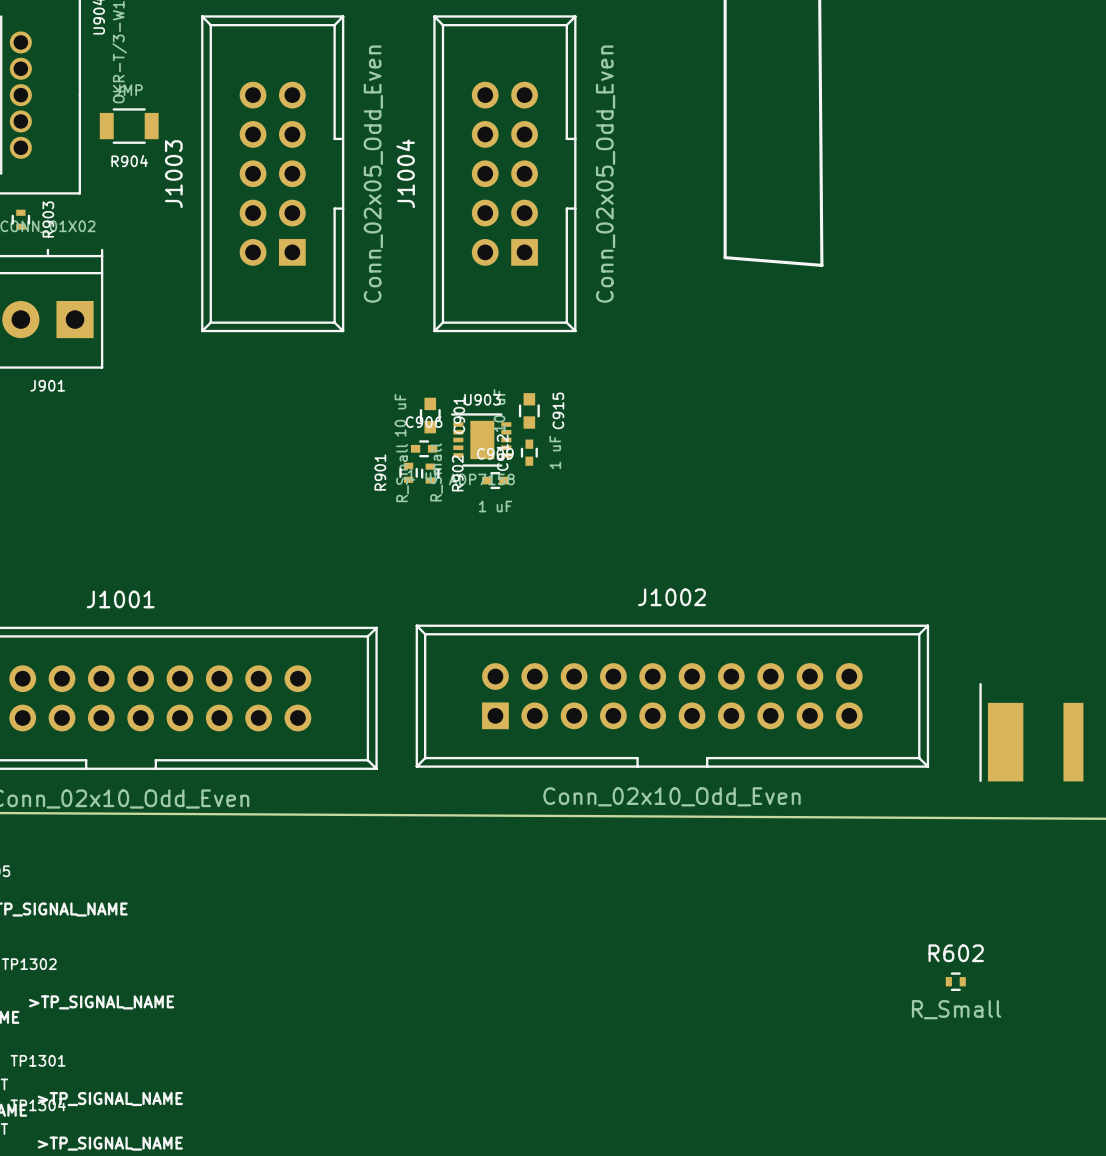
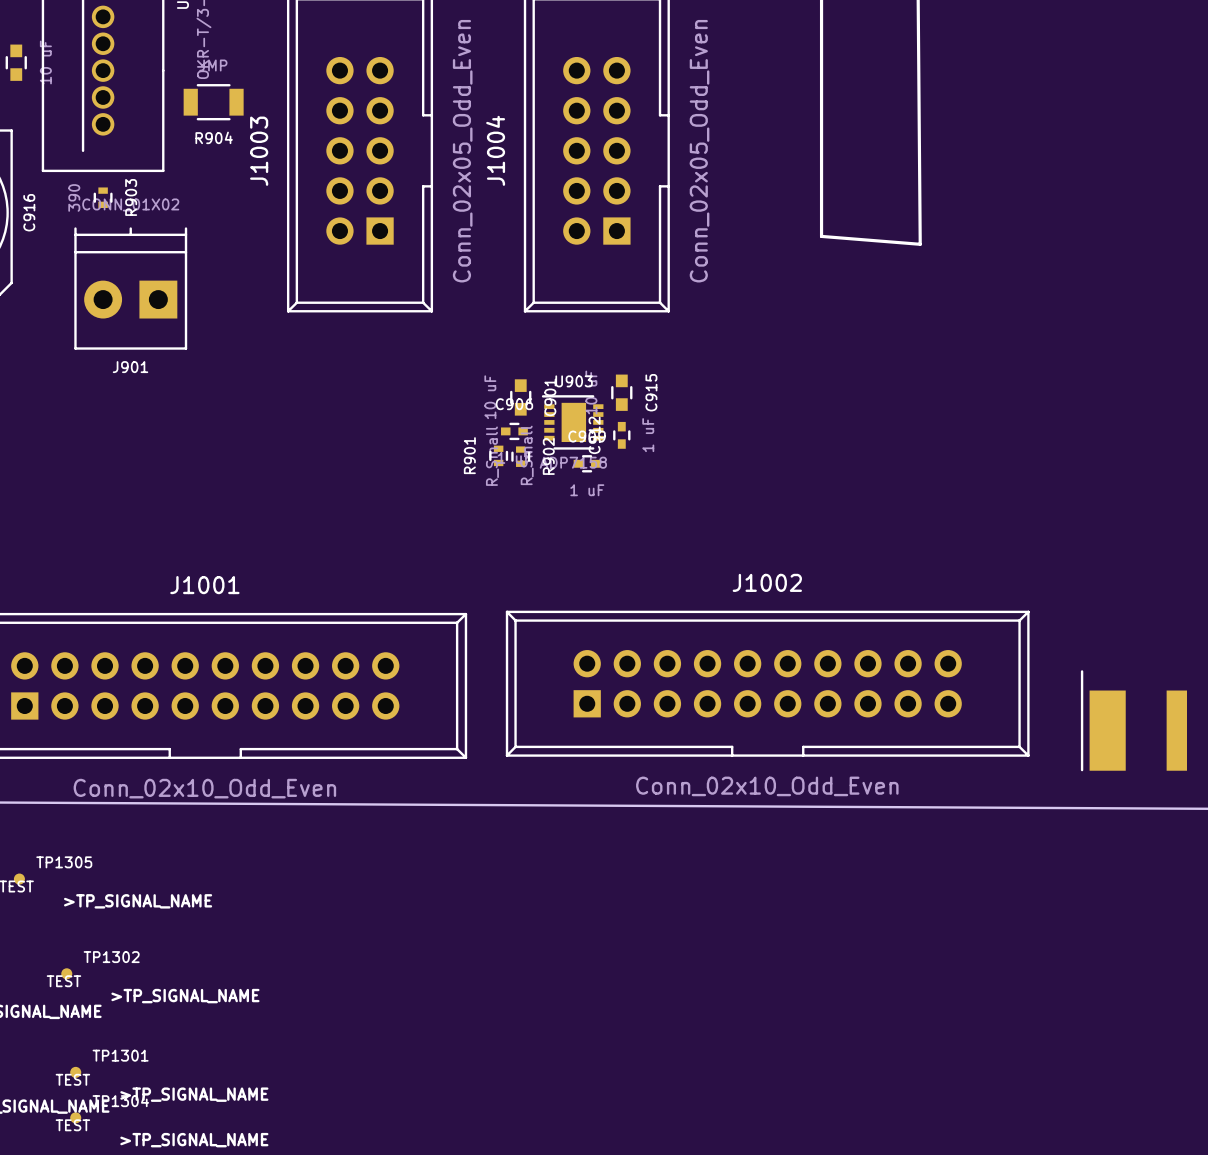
R602: R_Small (955, 981) -> none

